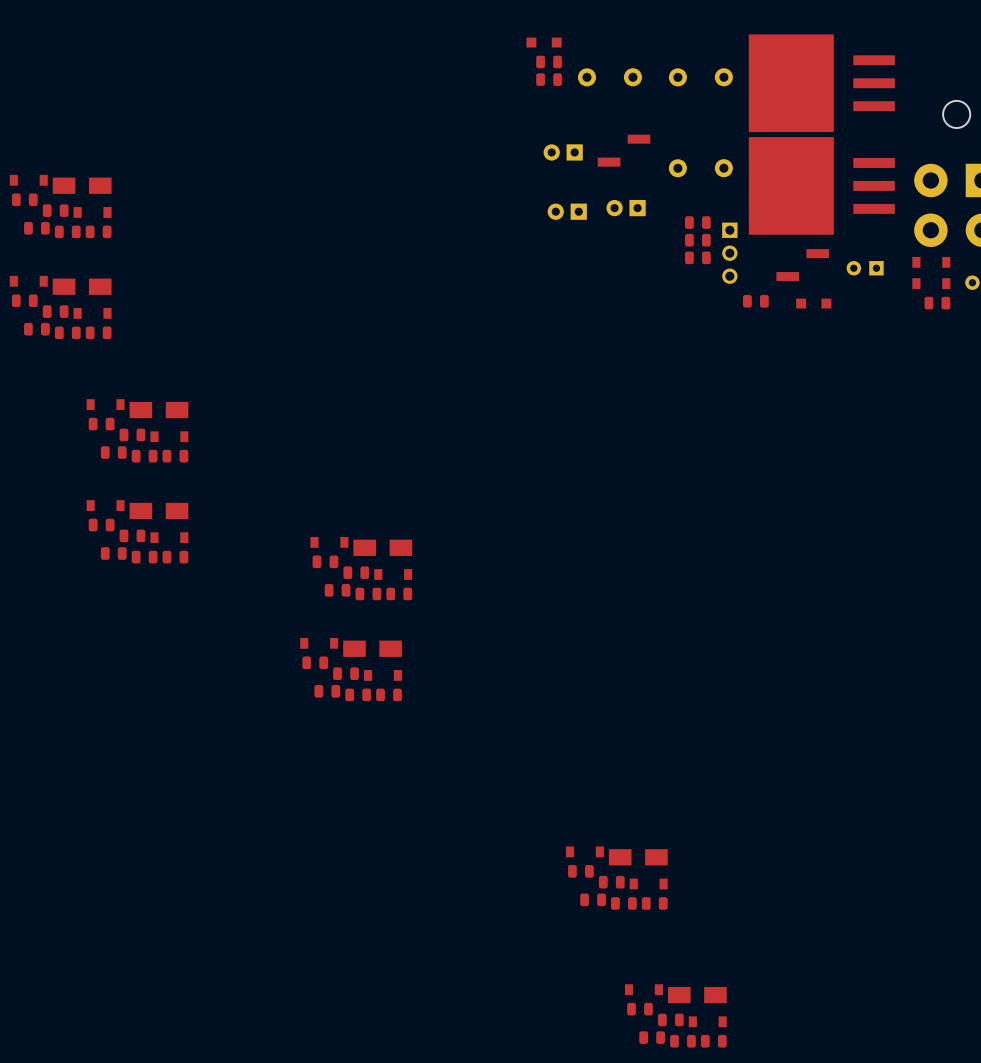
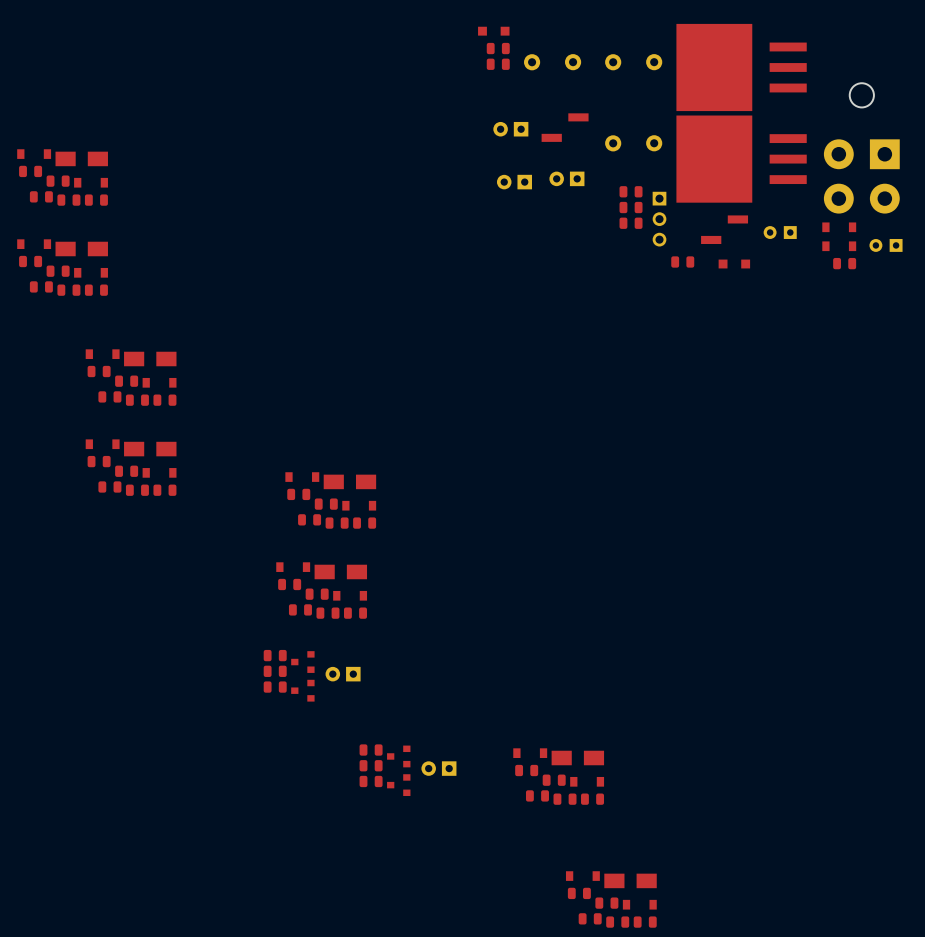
part: none -> (275, 655)
part: none -> (302, 662)
part: none -> (275, 671)
part: none -> (343, 674)
part: none -> (275, 687)
part: none -> (302, 690)
part: none -> (371, 750)
part: none -> (398, 756)
part: none -> (371, 765)
part: none -> (438, 768)
part: none -> (371, 781)
part: none -> (398, 785)

